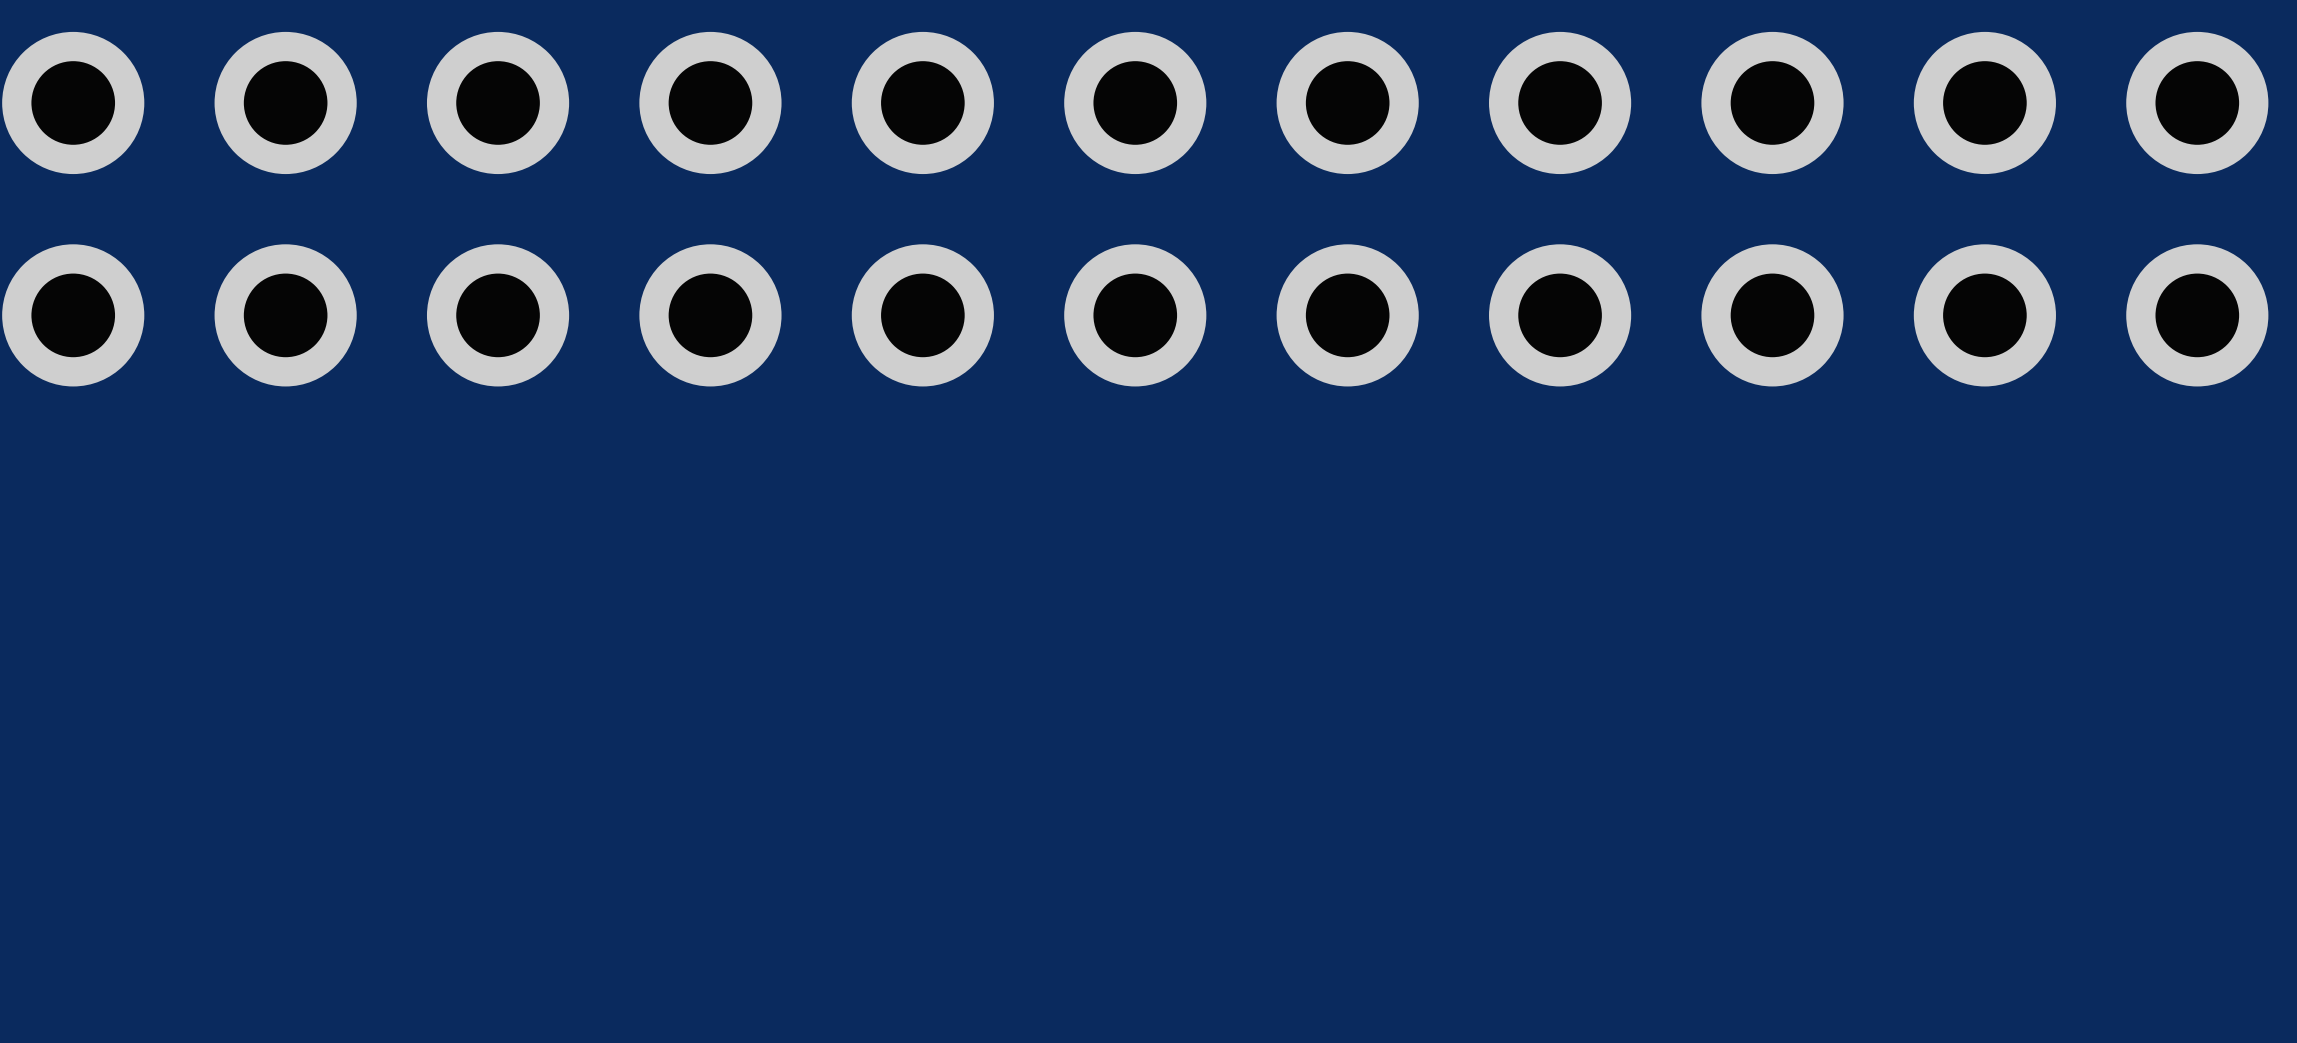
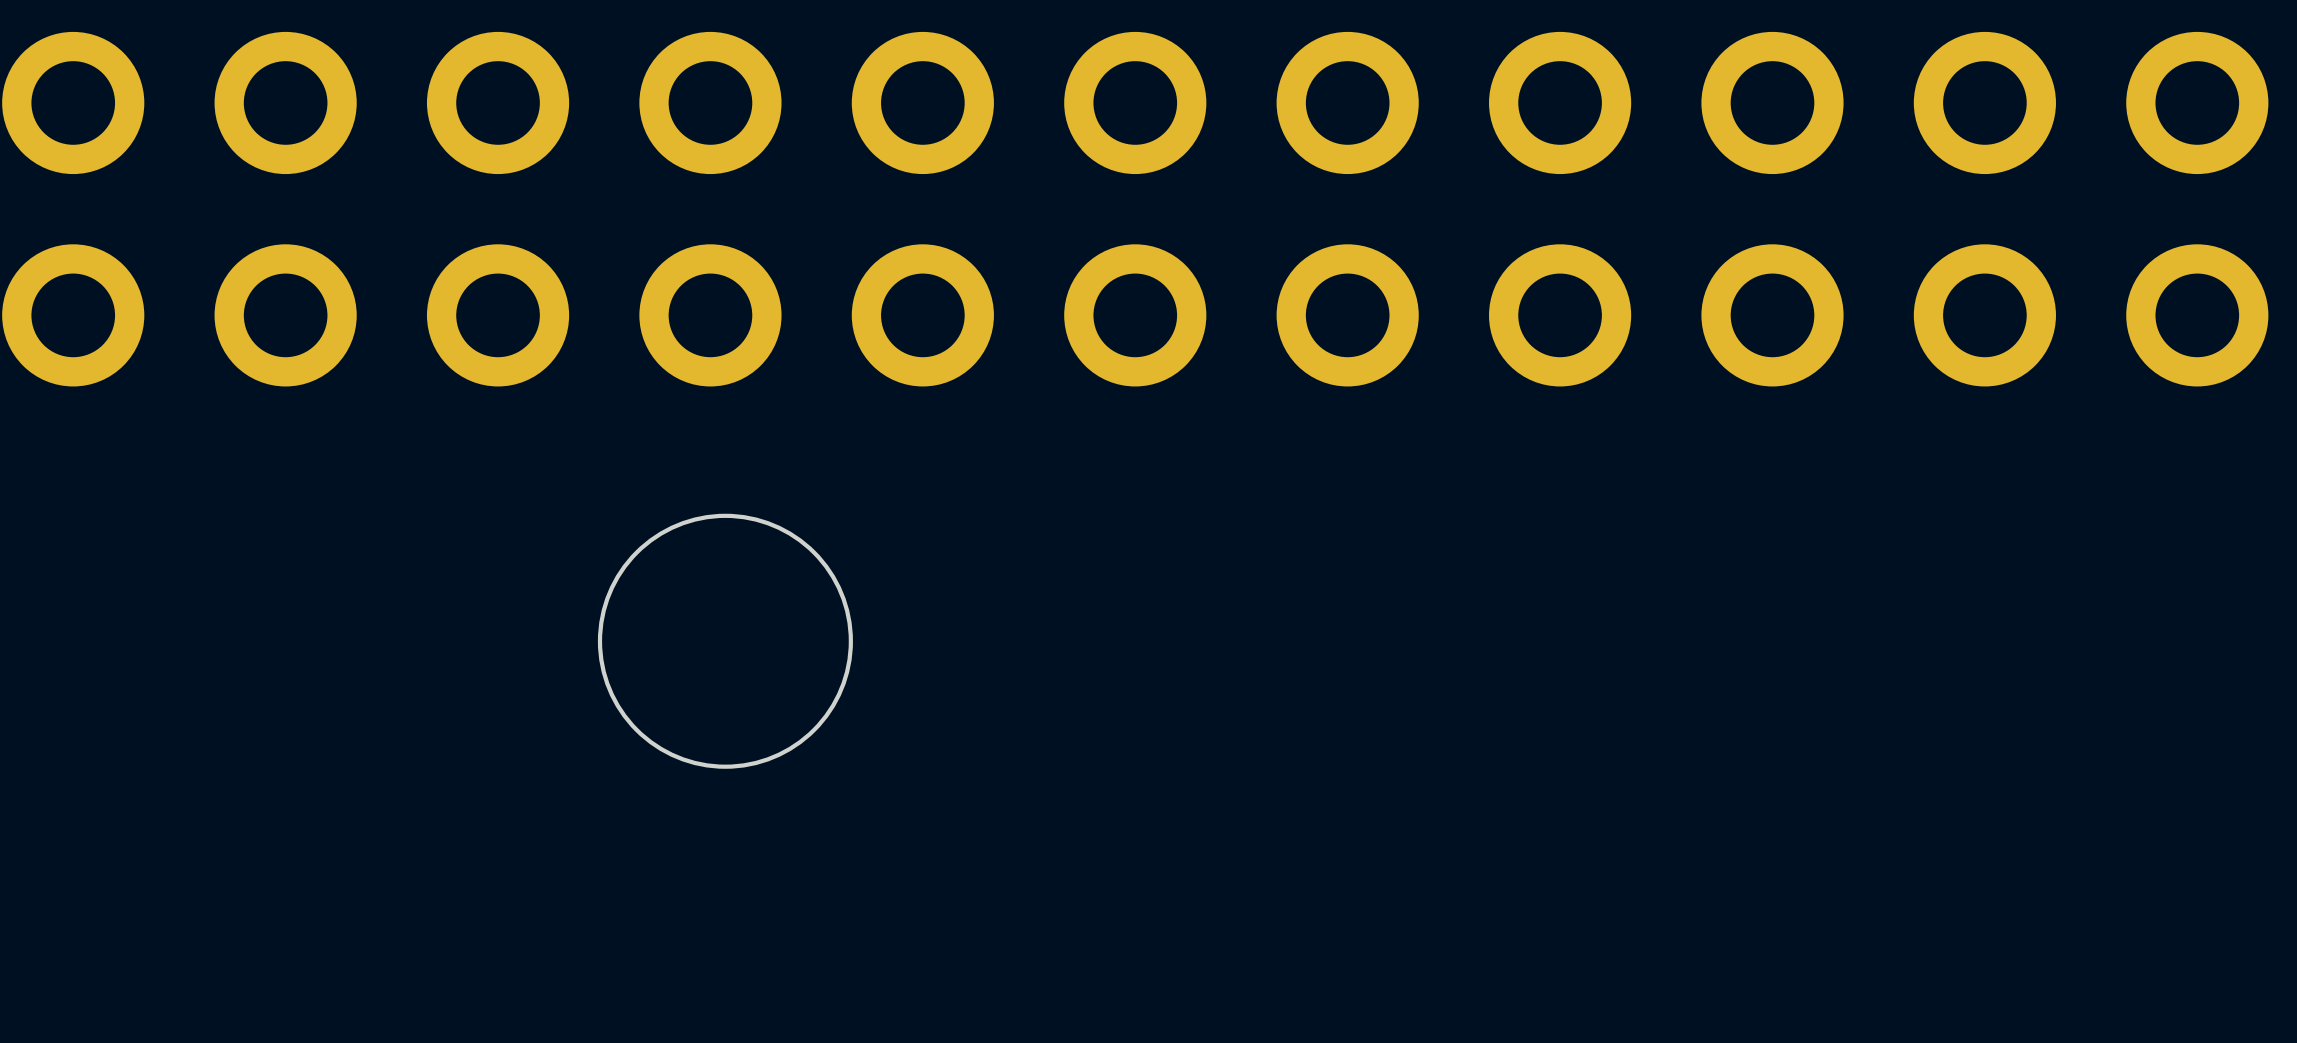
round board edge: none -> [597, 513, 853, 769]

